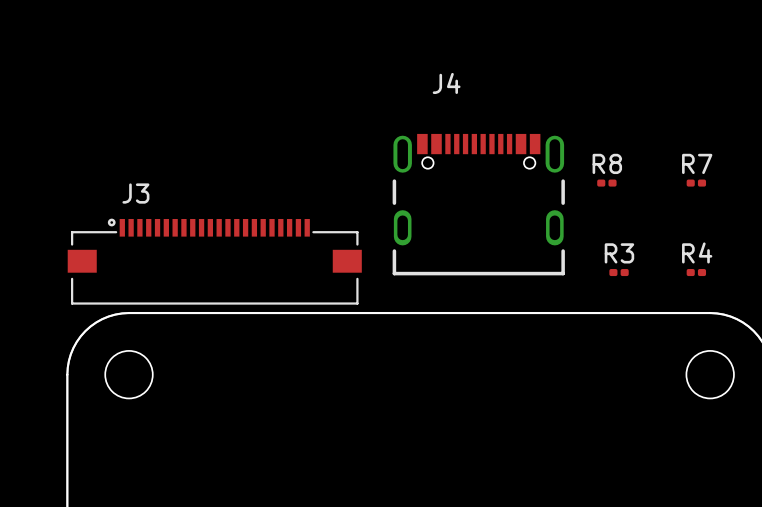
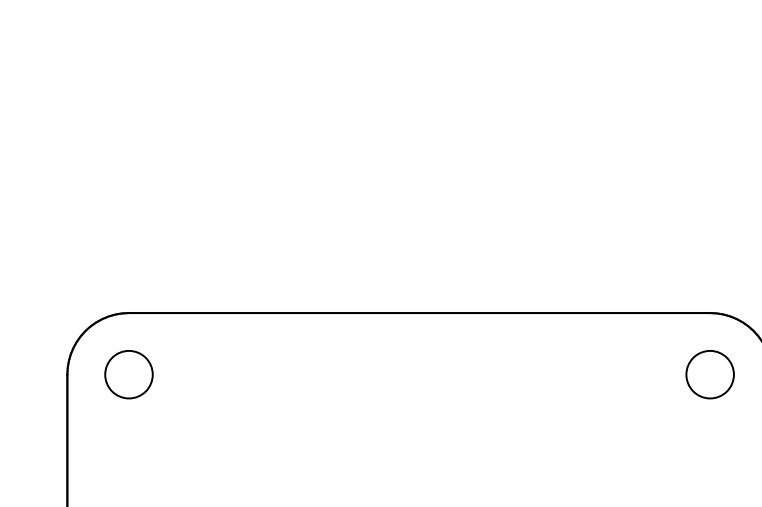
R8: (606, 183) -> none
R7: (696, 183) -> none
J4: (478, 204) -> none
J3: (214, 261) -> none
R3: (619, 272) -> none
R4: (696, 272) -> none

